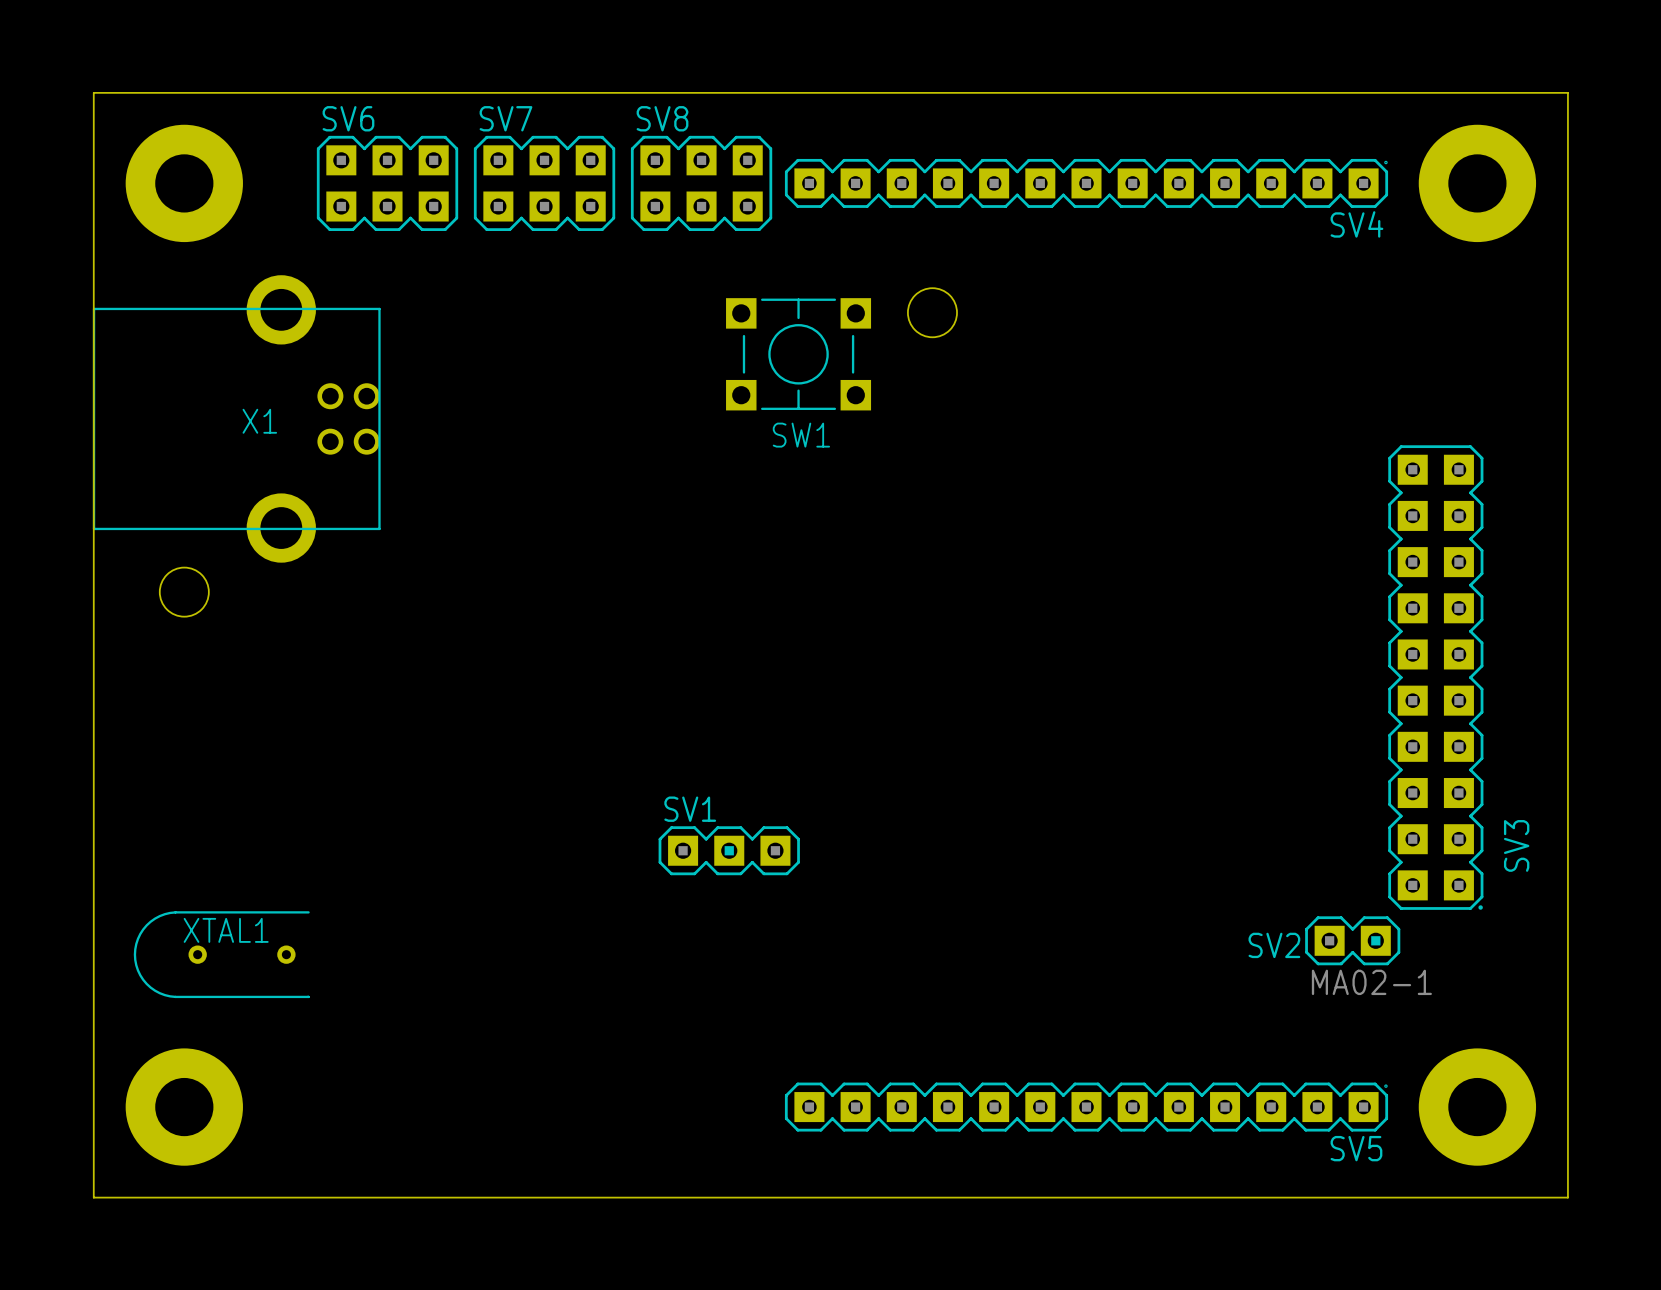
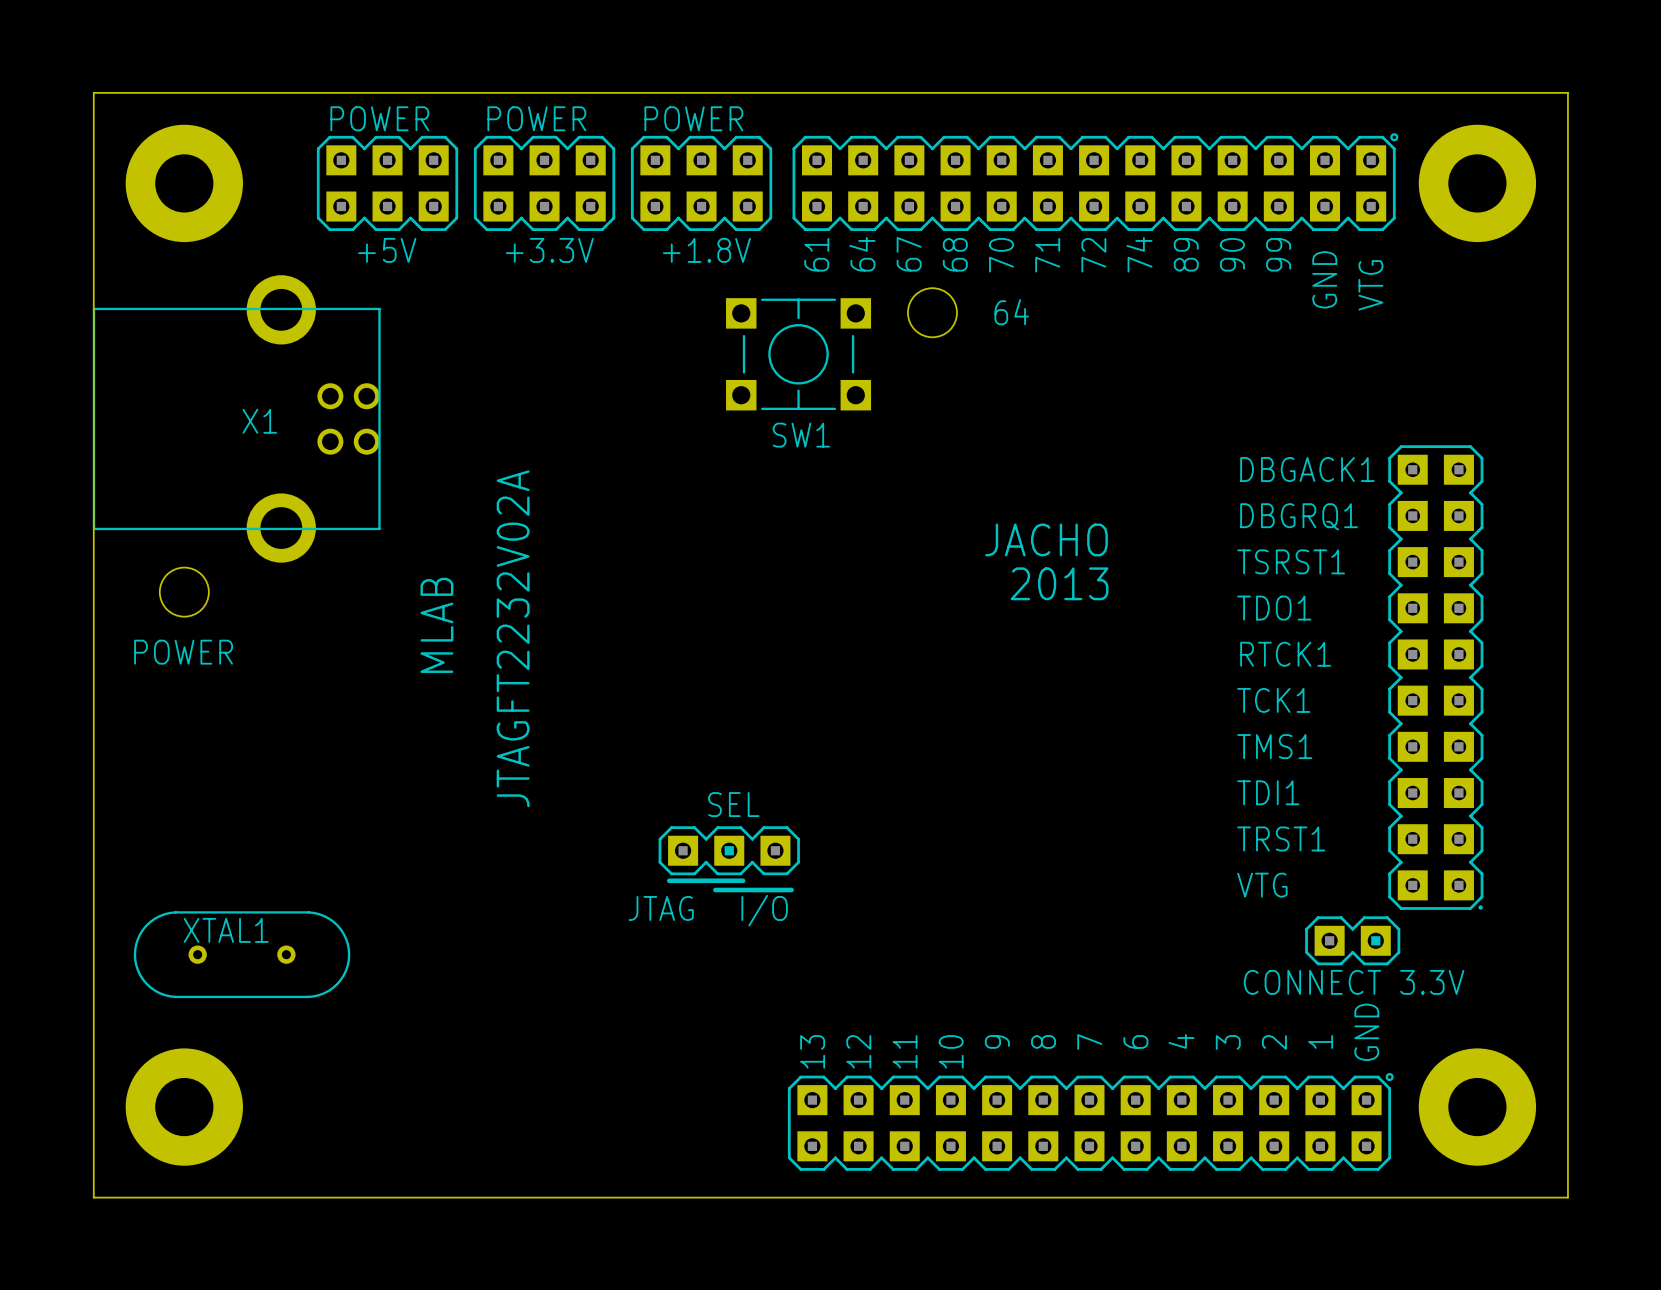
SV6 name: SV6 (348, 118) -> none
text: none -> POWER (379, 118)
SV7 name: SV7 (505, 118) -> none
text: none -> POWER (536, 118)
SV8 name: SV8 (662, 118) -> none
text: none -> POWER (693, 118)
part: none -> (1095, 182)
SV4: (1086, 183) -> none
text: none -> +5V (387, 250)
text: none -> +3.3V (549, 250)
text: none -> +1.8V (706, 250)
text: none -> 61 (816, 254)
text: none -> 64 (862, 254)
text: none -> 67 (909, 254)
text: none -> 68 (955, 254)
text: none -> 74 (1139, 254)
text: none -> 89 (1186, 254)
text: none -> 90 (1232, 254)
text: none -> 99 (1278, 254)
text: none -> 70 (1001, 255)
text: none -> 71 (1047, 255)
text: none -> 72 (1093, 255)
text: none -> GND (1324, 279)
text: none -> VTG (1370, 285)
text: none -> 64 (1011, 312)
text: none -> DBGACK1 (1307, 469)
text: none -> DBGRQ1 (1299, 516)
text: none -> JACHO (1046, 539)
text: none -> TSRST1 (1291, 561)
text: none -> 2013 (1059, 583)
text: none -> TDO1 (1274, 608)
text: none -> MLAB (436, 625)
text: none -> JTAGFT2232V02A (513, 638)
text: none -> POWER (183, 652)
text: none -> RTCK1 (1285, 654)
text: none -> TCK1 (1273, 700)
text: none -> TMS1 (1274, 746)
text: none -> TDI1 (1268, 792)
text: none -> SEL (733, 804)
SV1 name: SV1 (690, 809) -> none
text: none -> TRST1 (1281, 838)
SV3 name: SV3 (1516, 845) -> none
line: none -> (669, 880) (743, 880)
text: none -> VTG (1262, 885)
line: none -> (715, 890) (791, 890)
text: none -> JTAG (661, 908)
text: none -> I/O (764, 910)
XTAL1 footprint: [133, 911, 310, 999] -> [133, 911, 351, 999]
SV2 name: SV2 (1274, 945) -> none
text: none -> CONNECT 3.3V (1354, 982)
SV2 value: MA02-1 (1371, 982) -> none
text: none -> GND (1366, 1032)
text: none -> 9 (997, 1041)
text: none -> 8 (1043, 1041)
text: none -> 7 (1089, 1041)
text: none -> 6 (1135, 1041)
text: none -> 4 (1181, 1041)
text: none -> 1 (1320, 1041)
text: none -> 3 (1228, 1042)
text: none -> 2 (1274, 1042)
text: none -> 13 (812, 1051)
text: none -> 12 (858, 1051)
text: none -> 11 (904, 1051)
text: none -> 10 (951, 1051)
SV5: (1086, 1107) -> none
part: none -> (1090, 1121)

